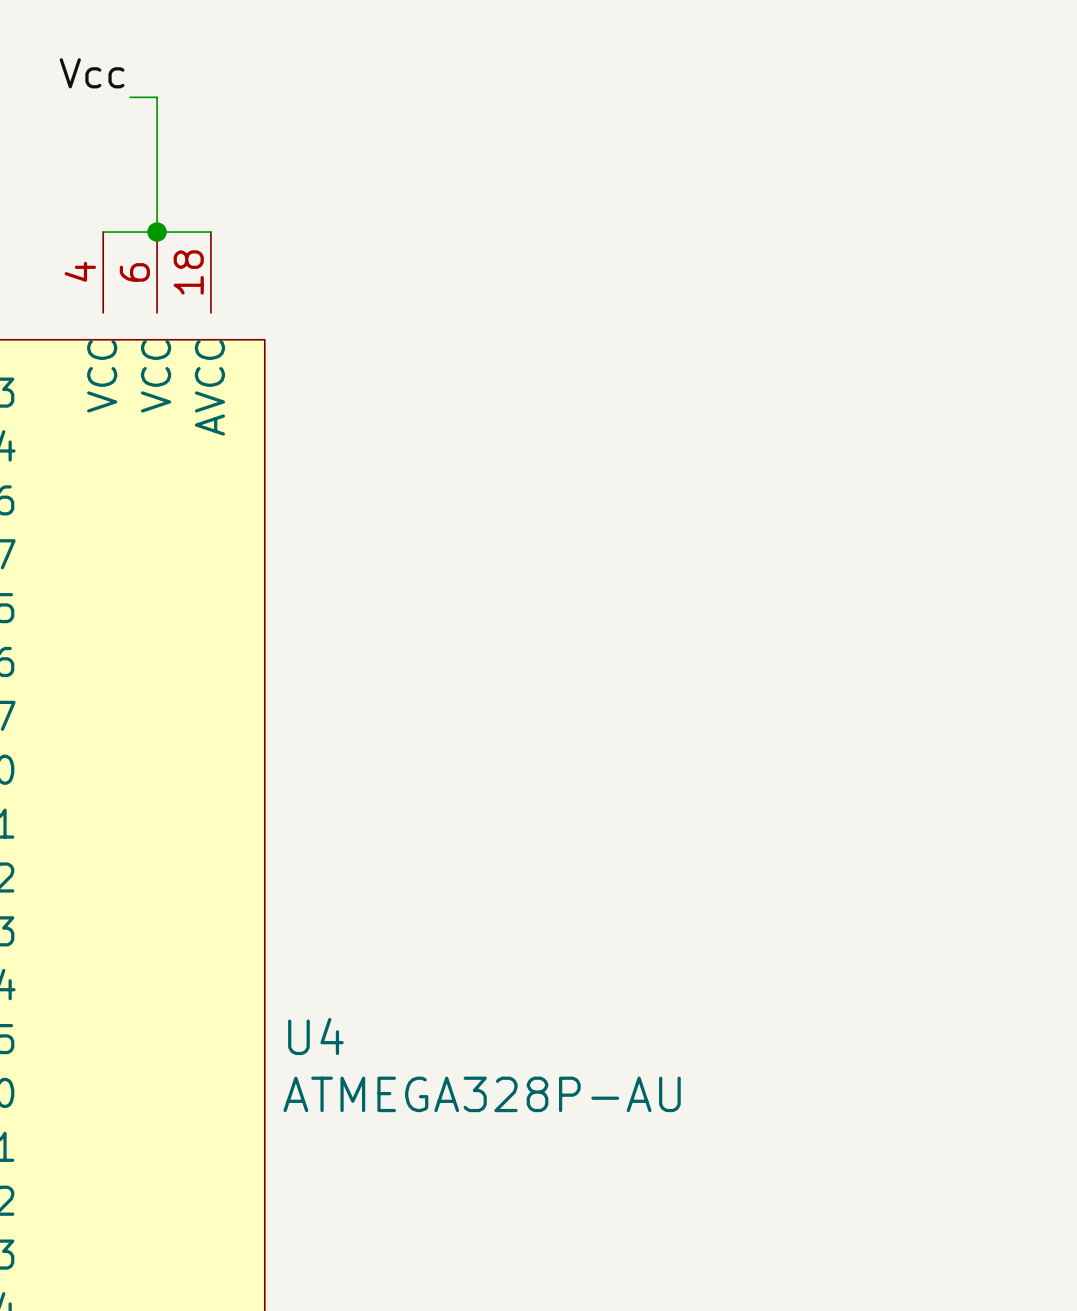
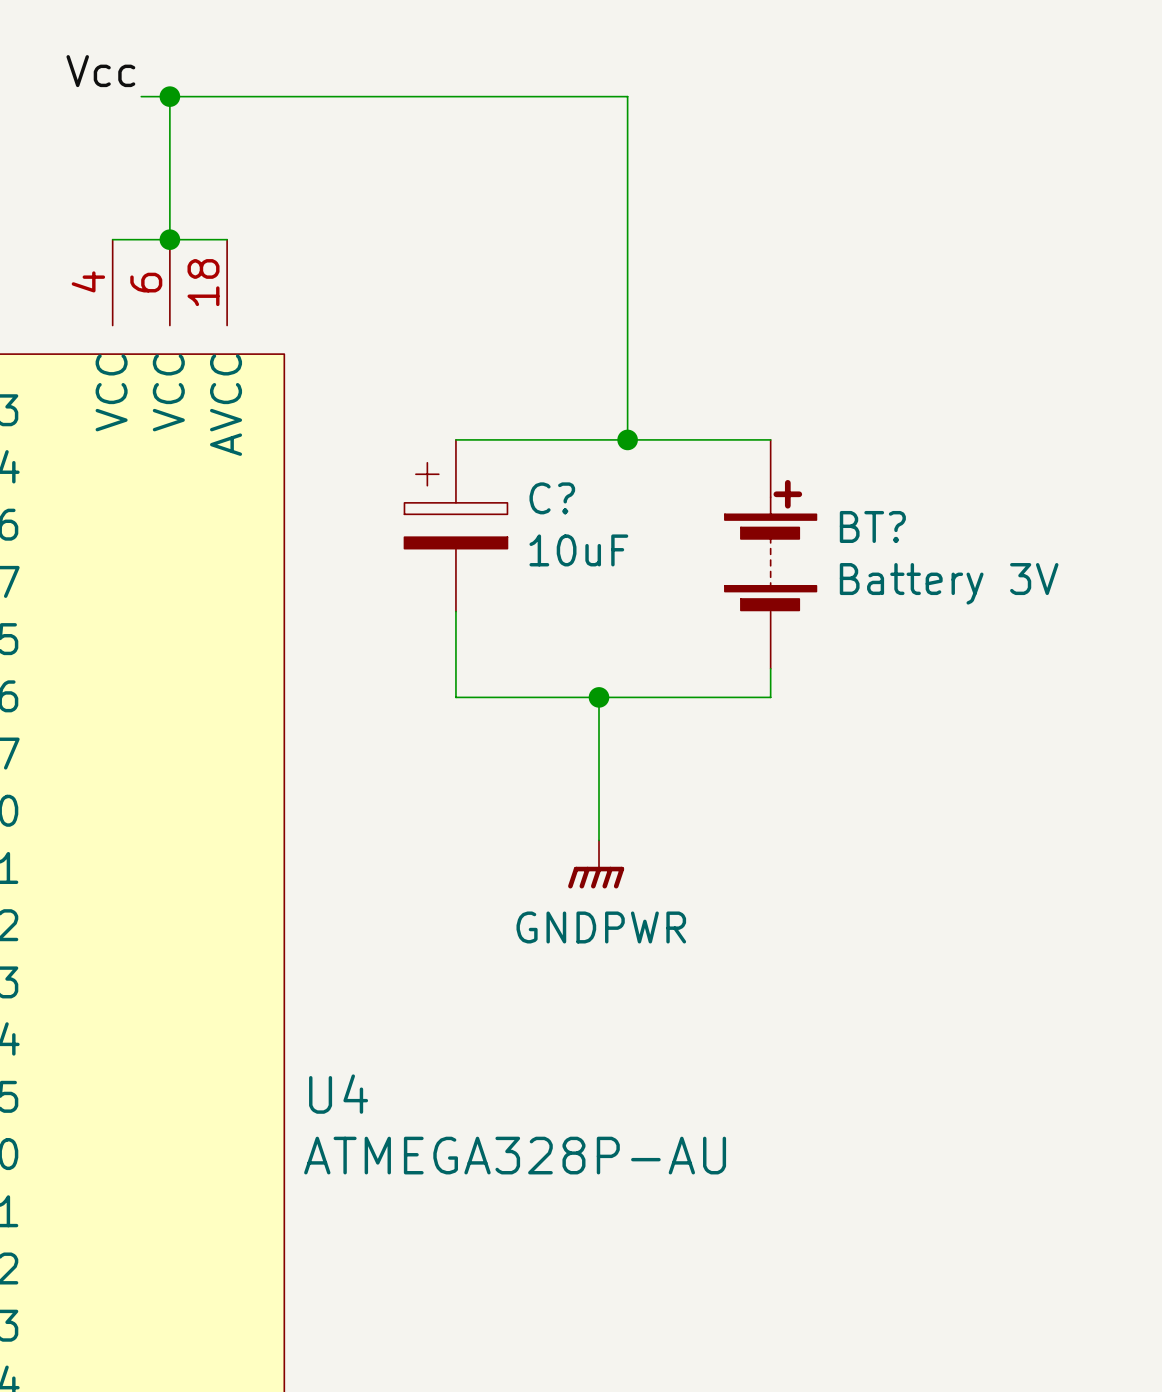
wire: none -> (169, 96) (627, 96) (627, 439)
junction: none -> (169, 96)
wire: none -> (455, 439) (770, 439)
junction: none -> (627, 439)
C?: none -> 10uF (455, 525)
BT?: none -> Battery 3V (770, 554)
wire: none -> (455, 611) (455, 697) (770, 697) (770, 668)
wire: none -> (599, 697) (599, 840)
junction: none -> (599, 697)
power symbol: none -> GNDPWR (596, 864)

